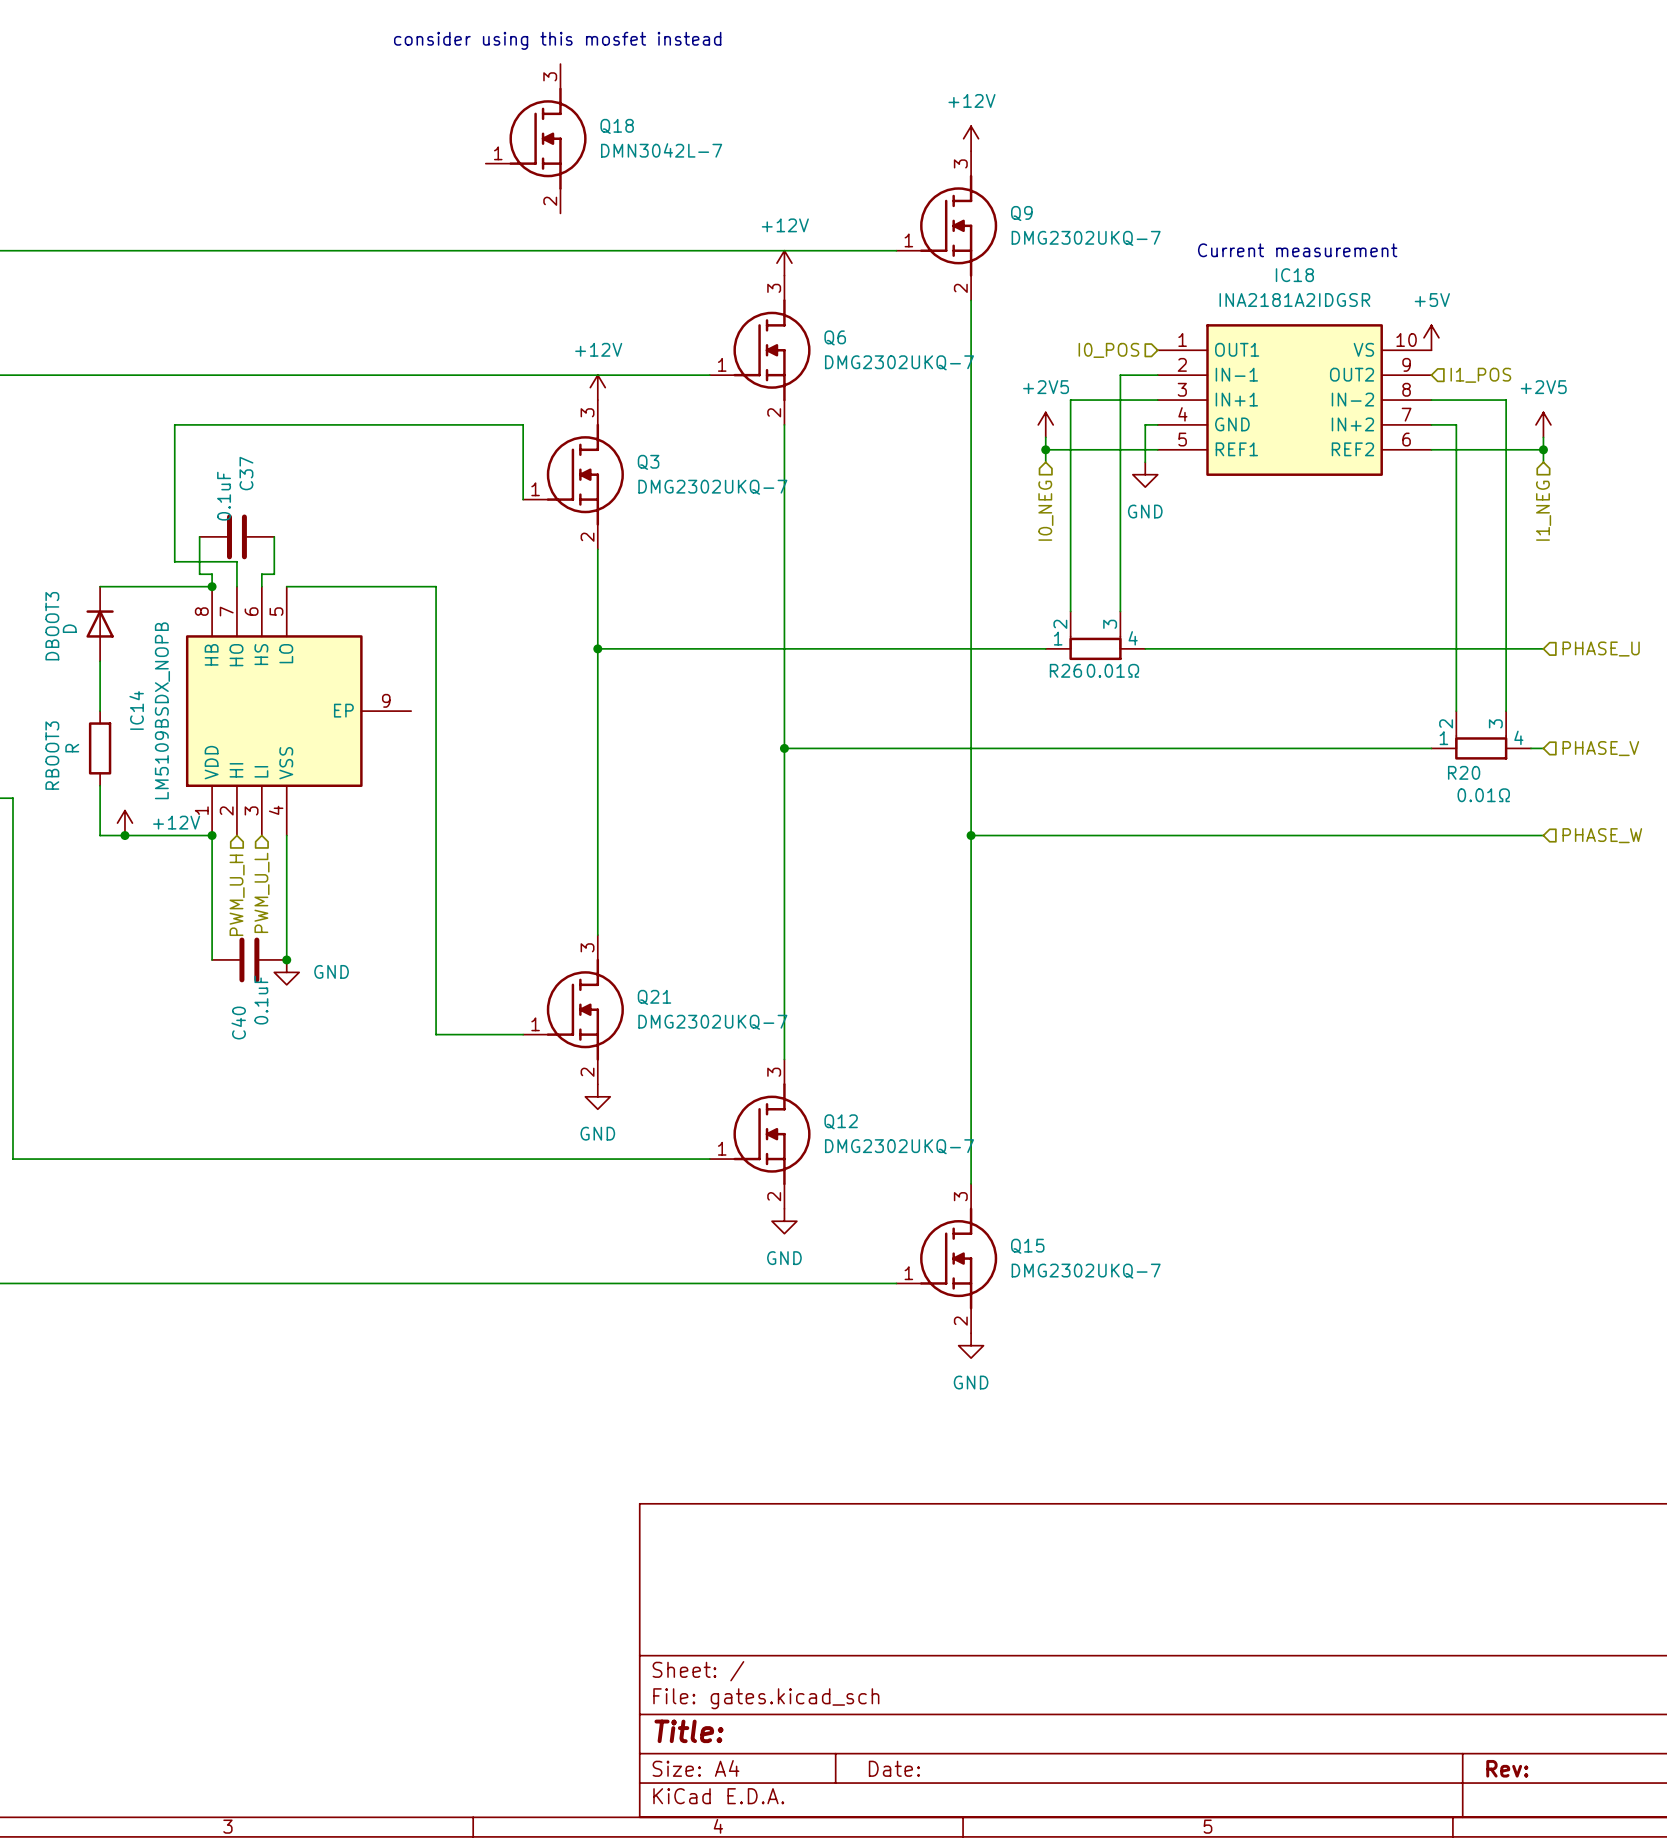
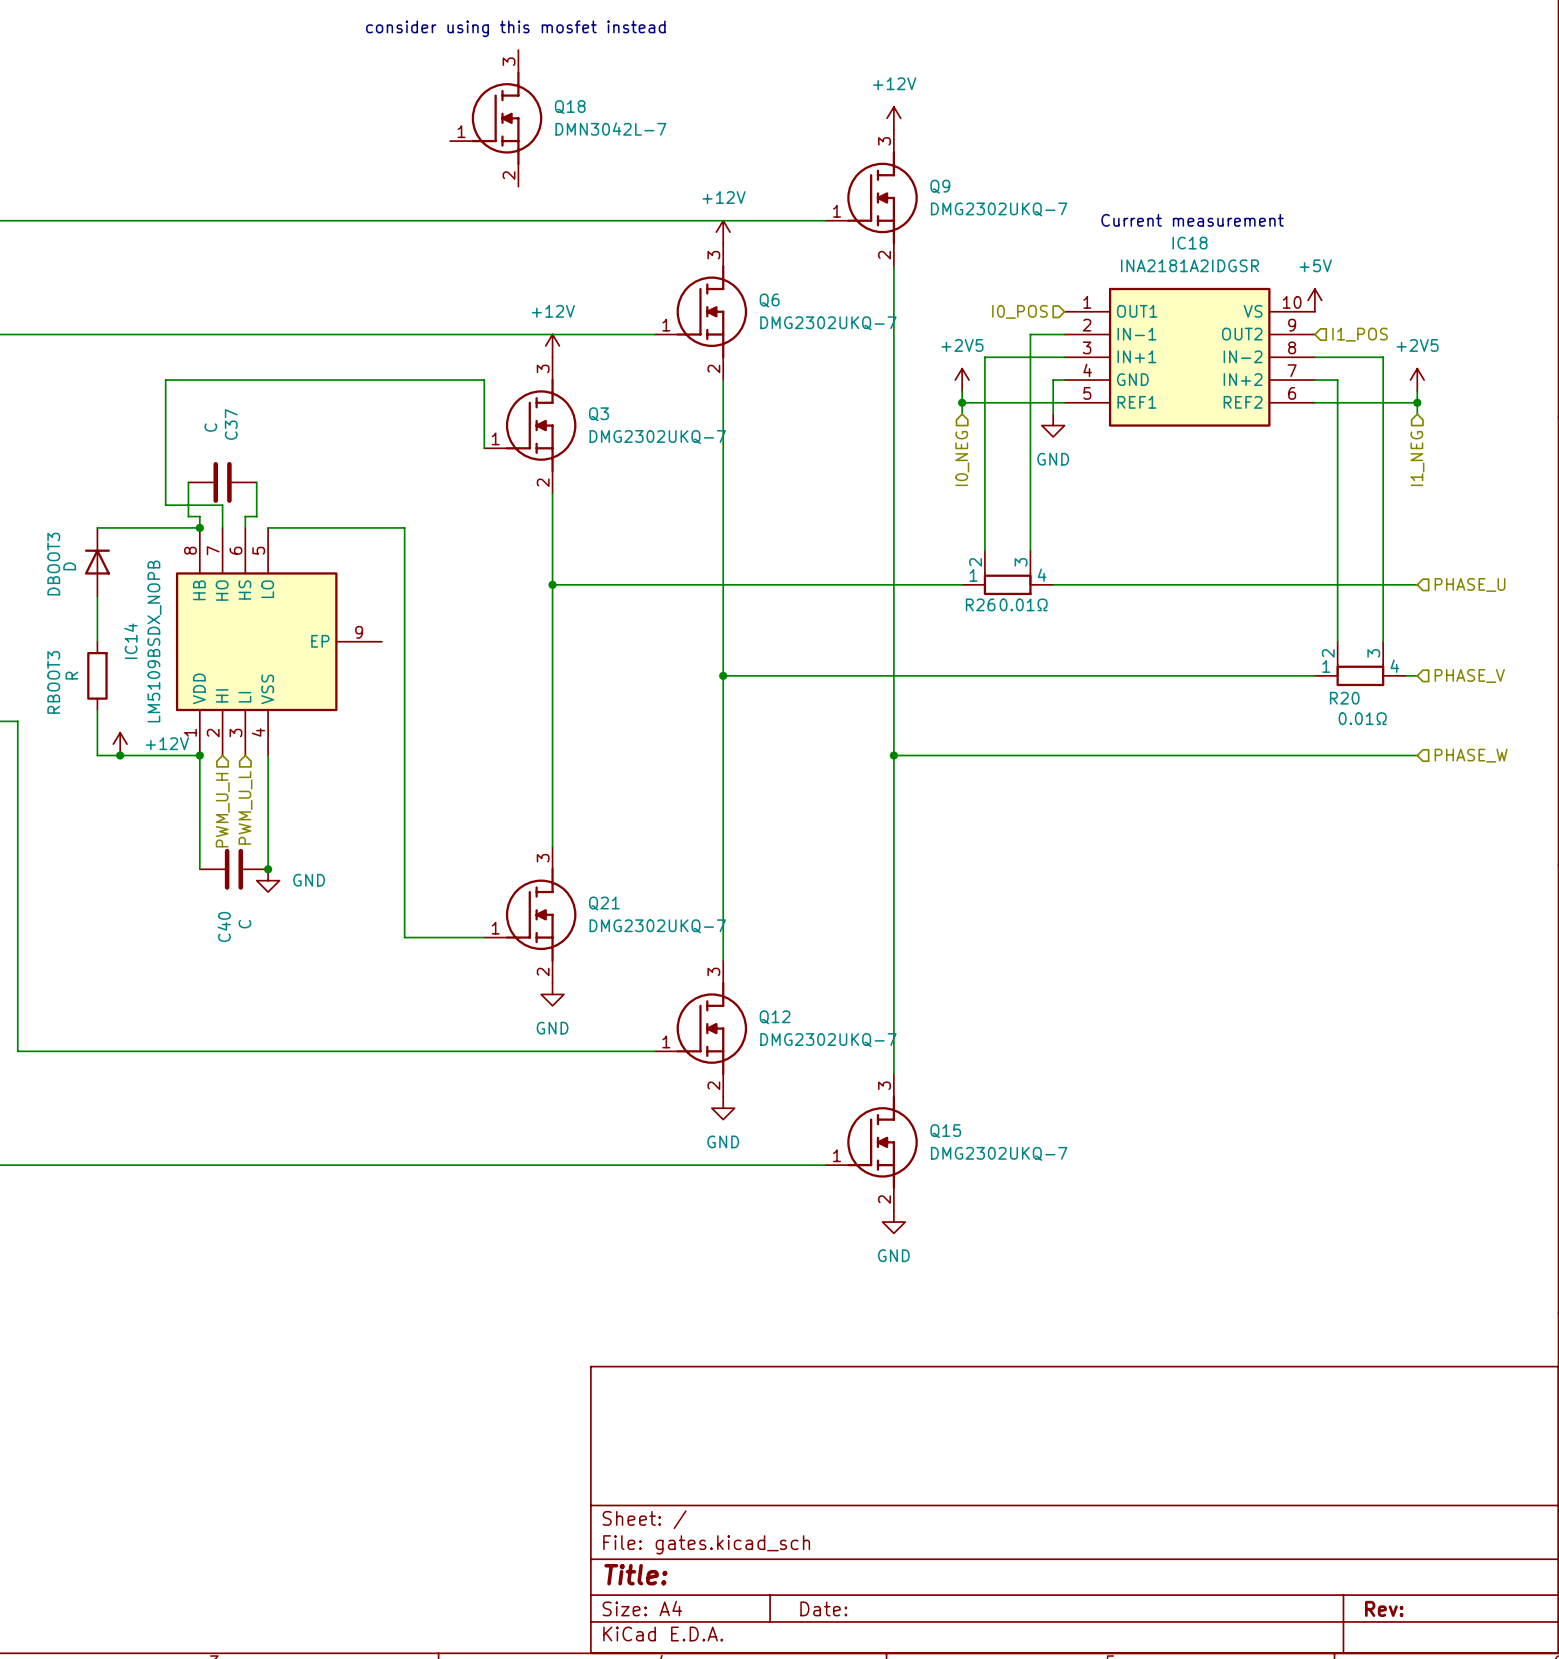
C37 value: 0.1uF (224, 496) -> C (210, 427)
C40 value: 0.1uF (261, 1000) -> C (244, 924)

